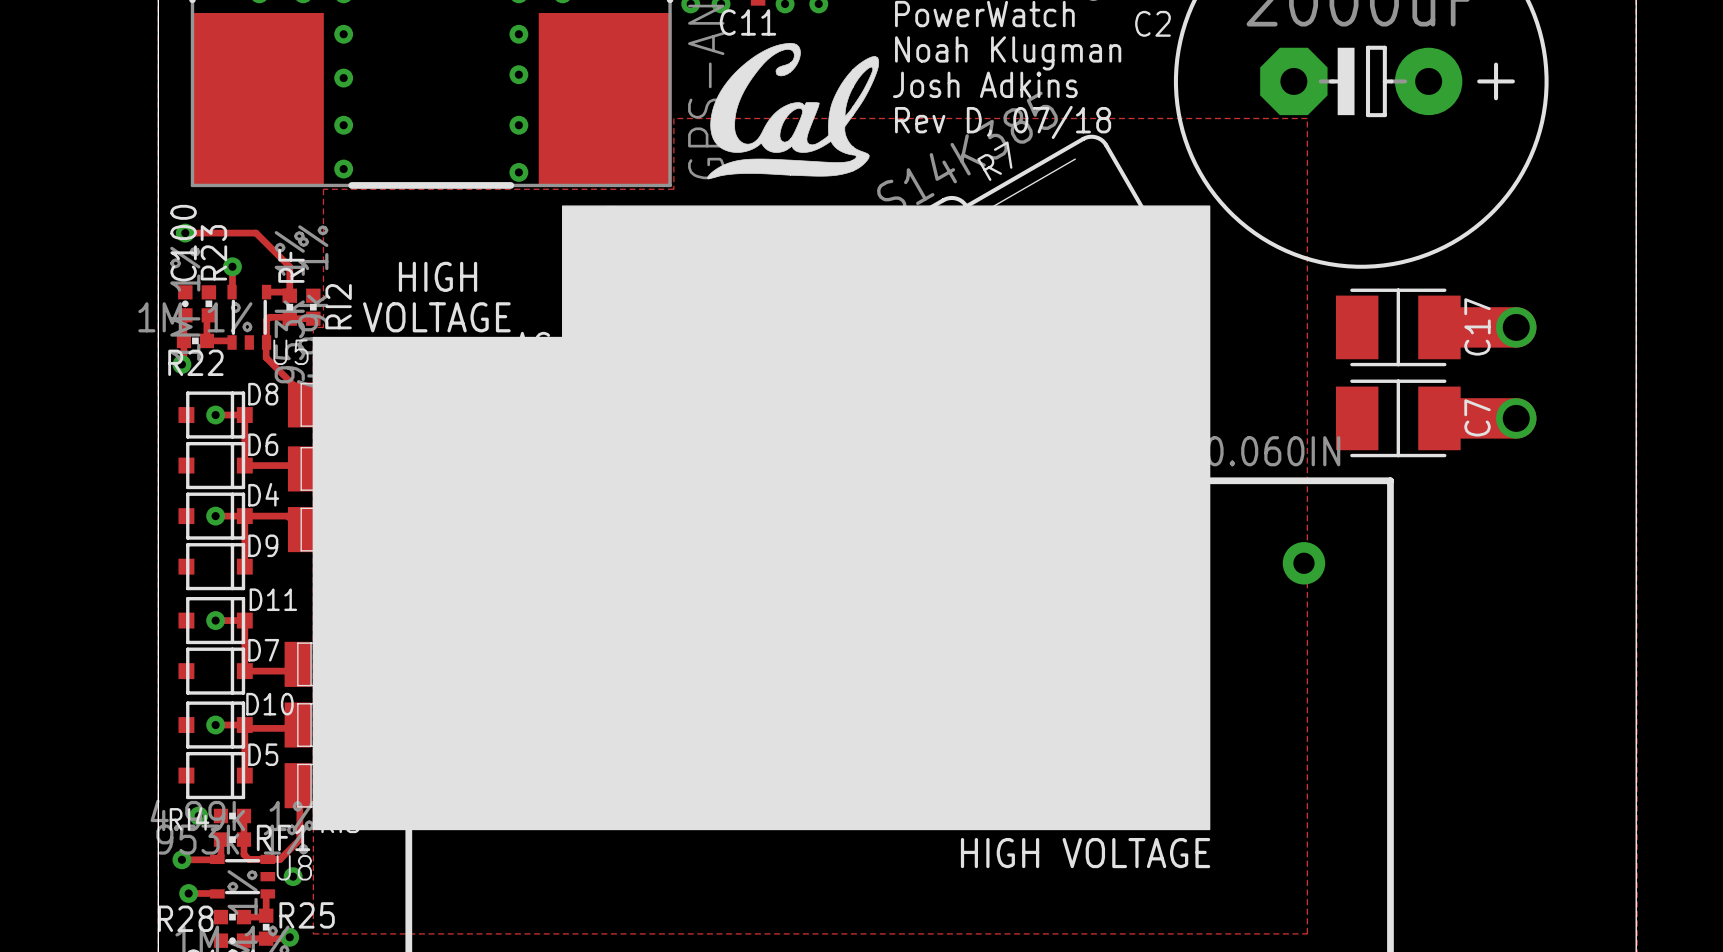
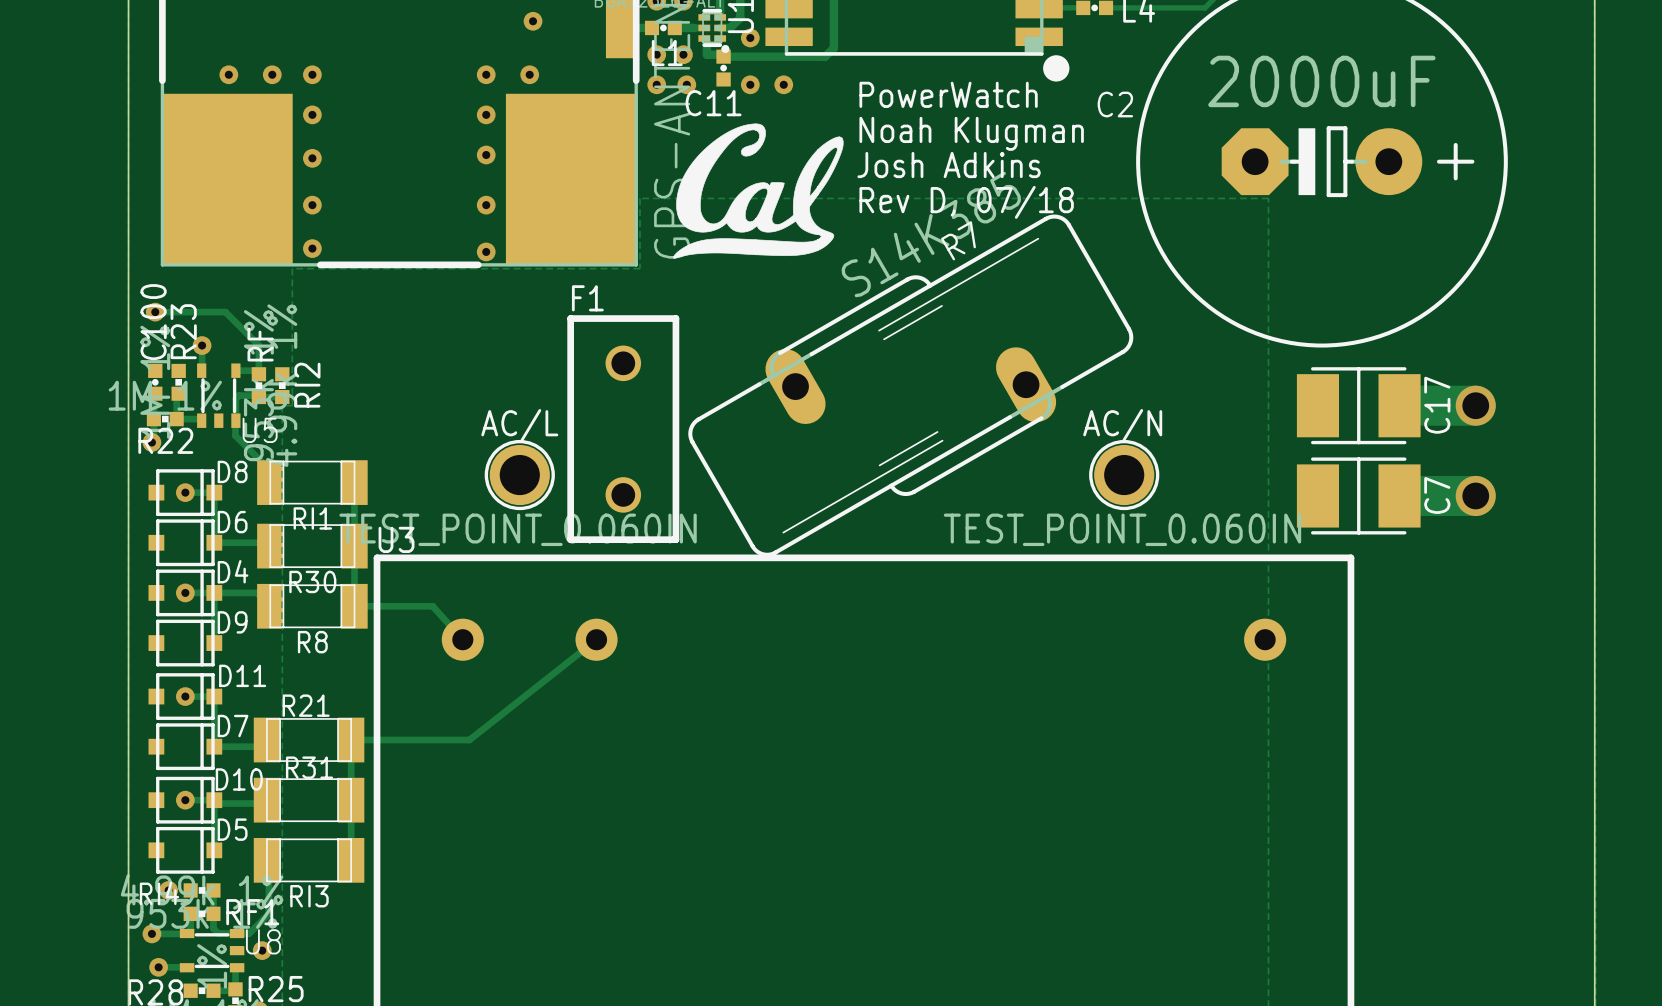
drawing: [312, 205, 1211, 831] -> none
text: HIGH (438, 276) -> none
text: VOLTAGE (436, 317) -> none
text: HIGH VOLTAGE (1085, 853) -> none

